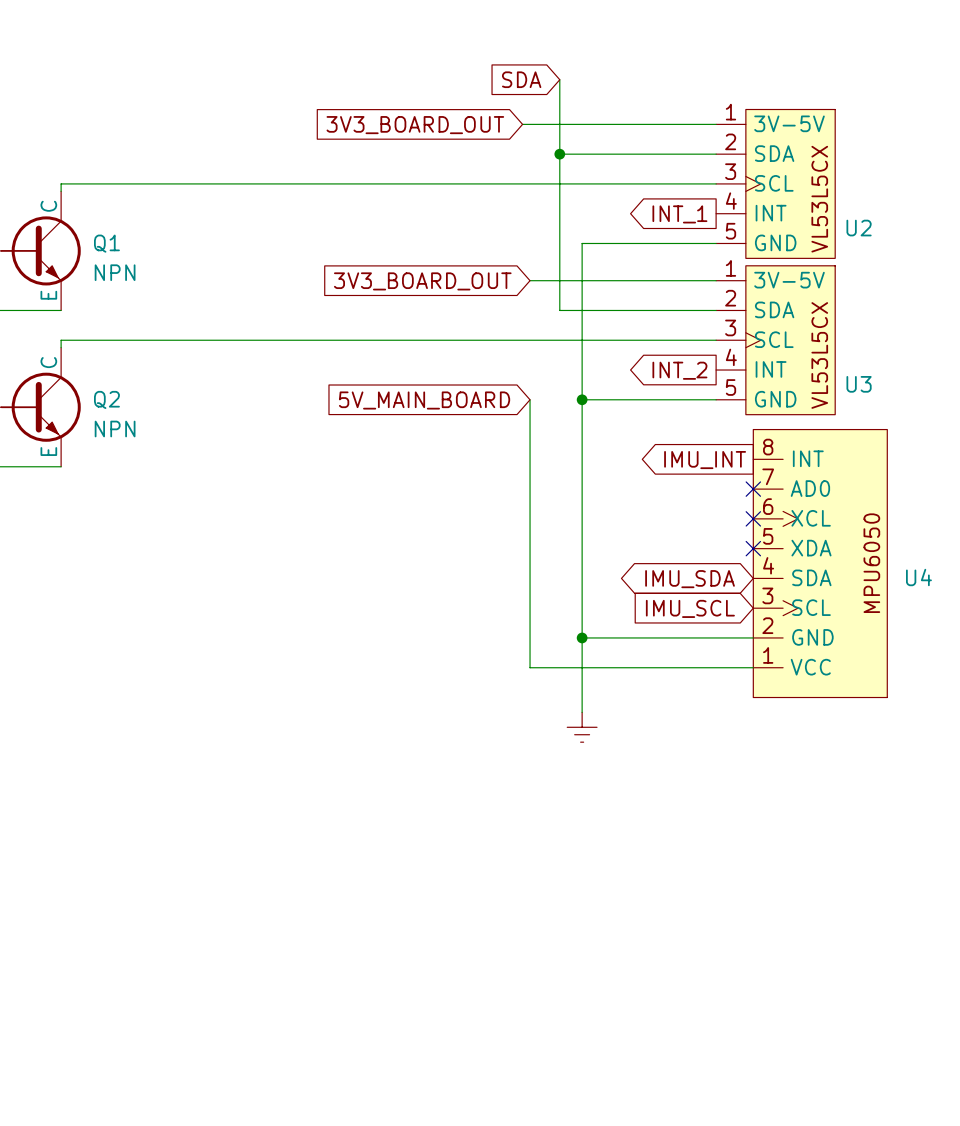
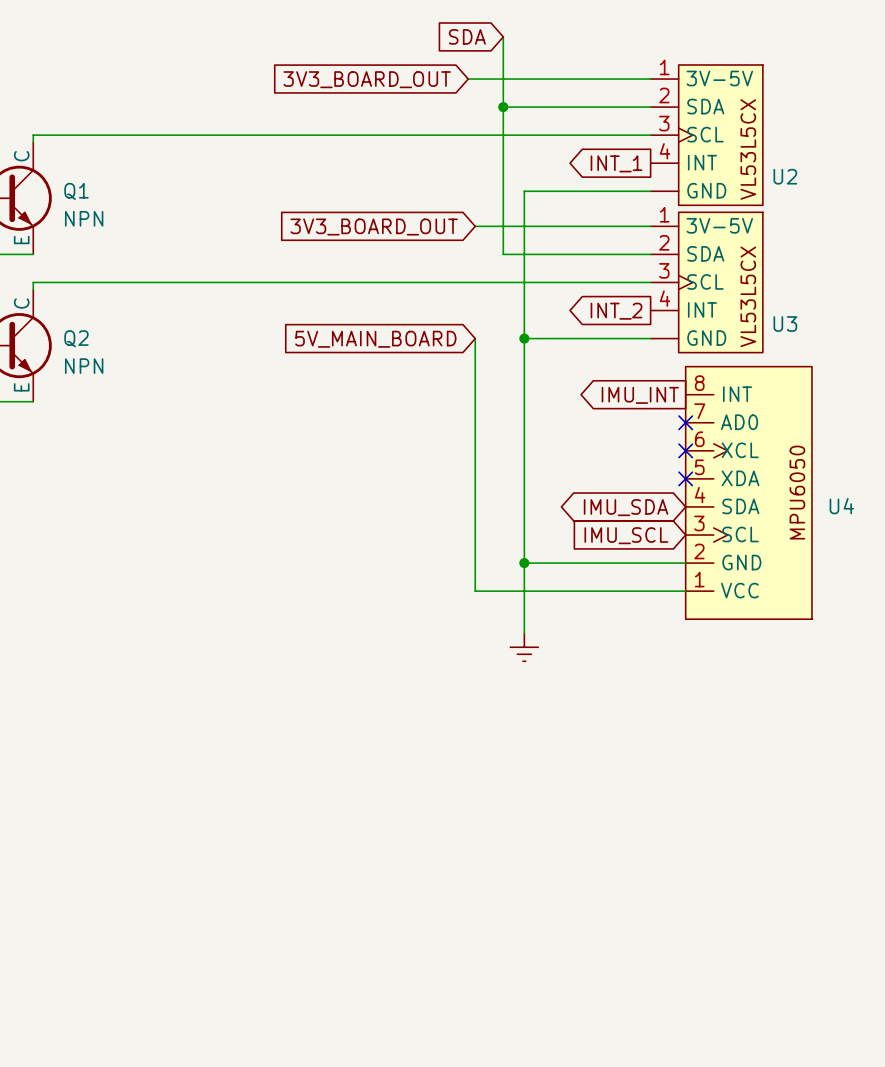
U2 pin number: 5 (730, 231) -> none
U3 pin number: 5 (730, 387) -> none

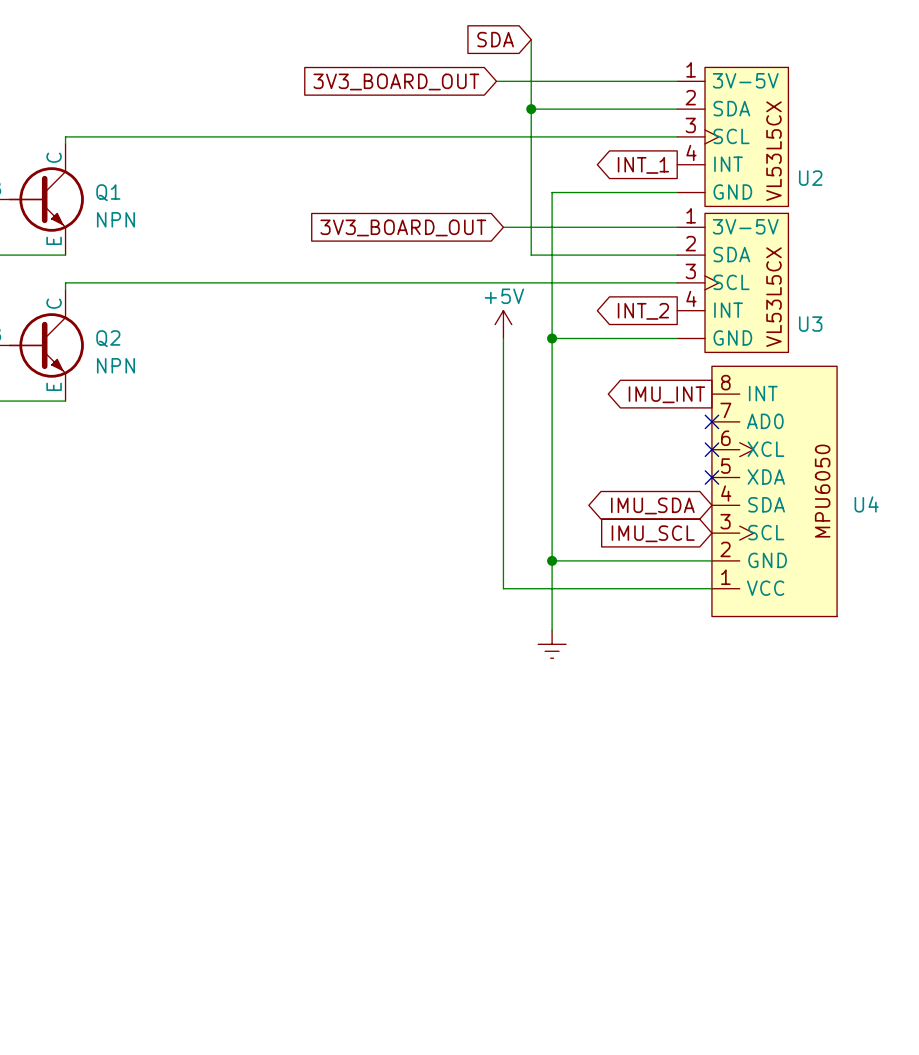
power symbol: none -> +5V (503, 324)
global label: 5V_MAIN_BOARD (375, 339) -> none

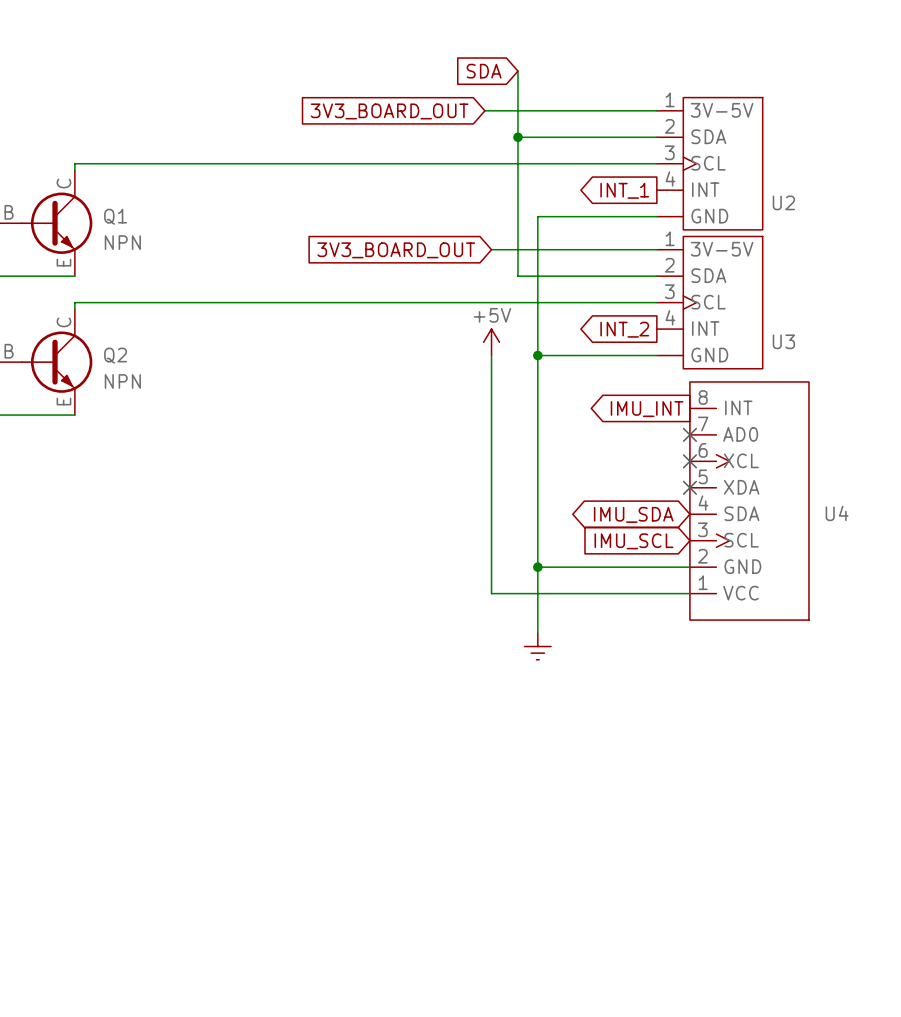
U2 text: VL53L5CX (773, 151) -> none
U3 text: VL53L5CX (773, 297) -> none
U4 text: MPU6050 (822, 491) -> none

